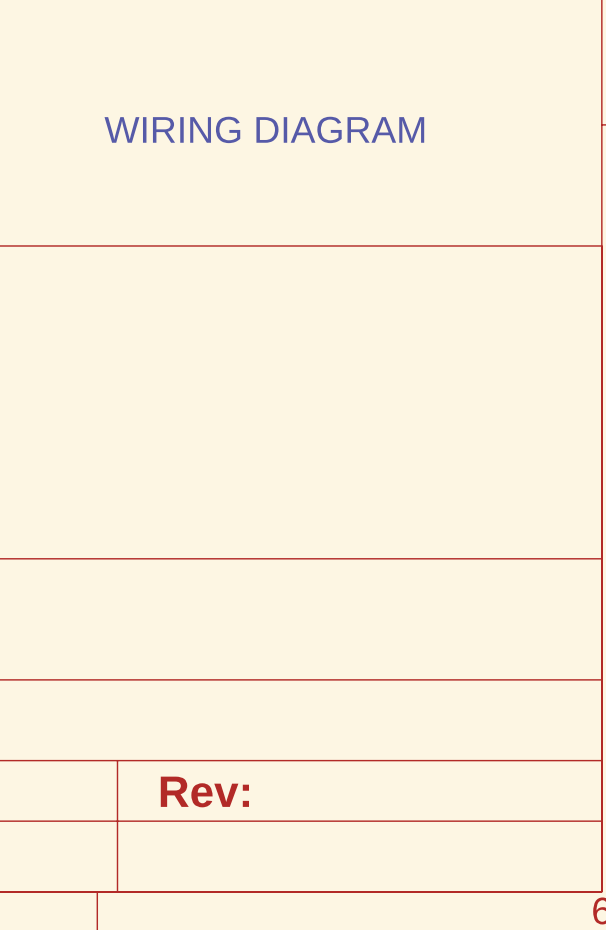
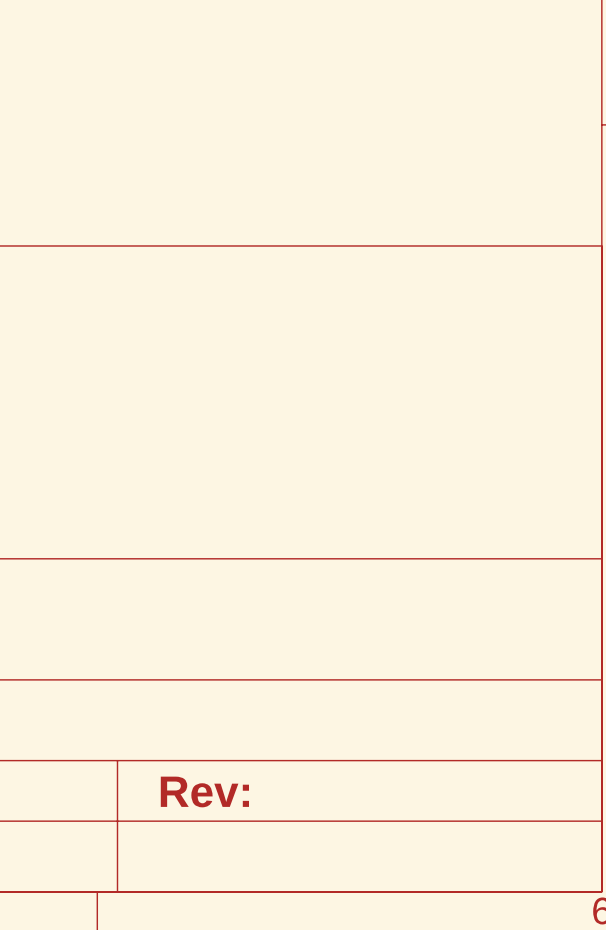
text: WIRING DIAGRAM (264, 129) -> none

